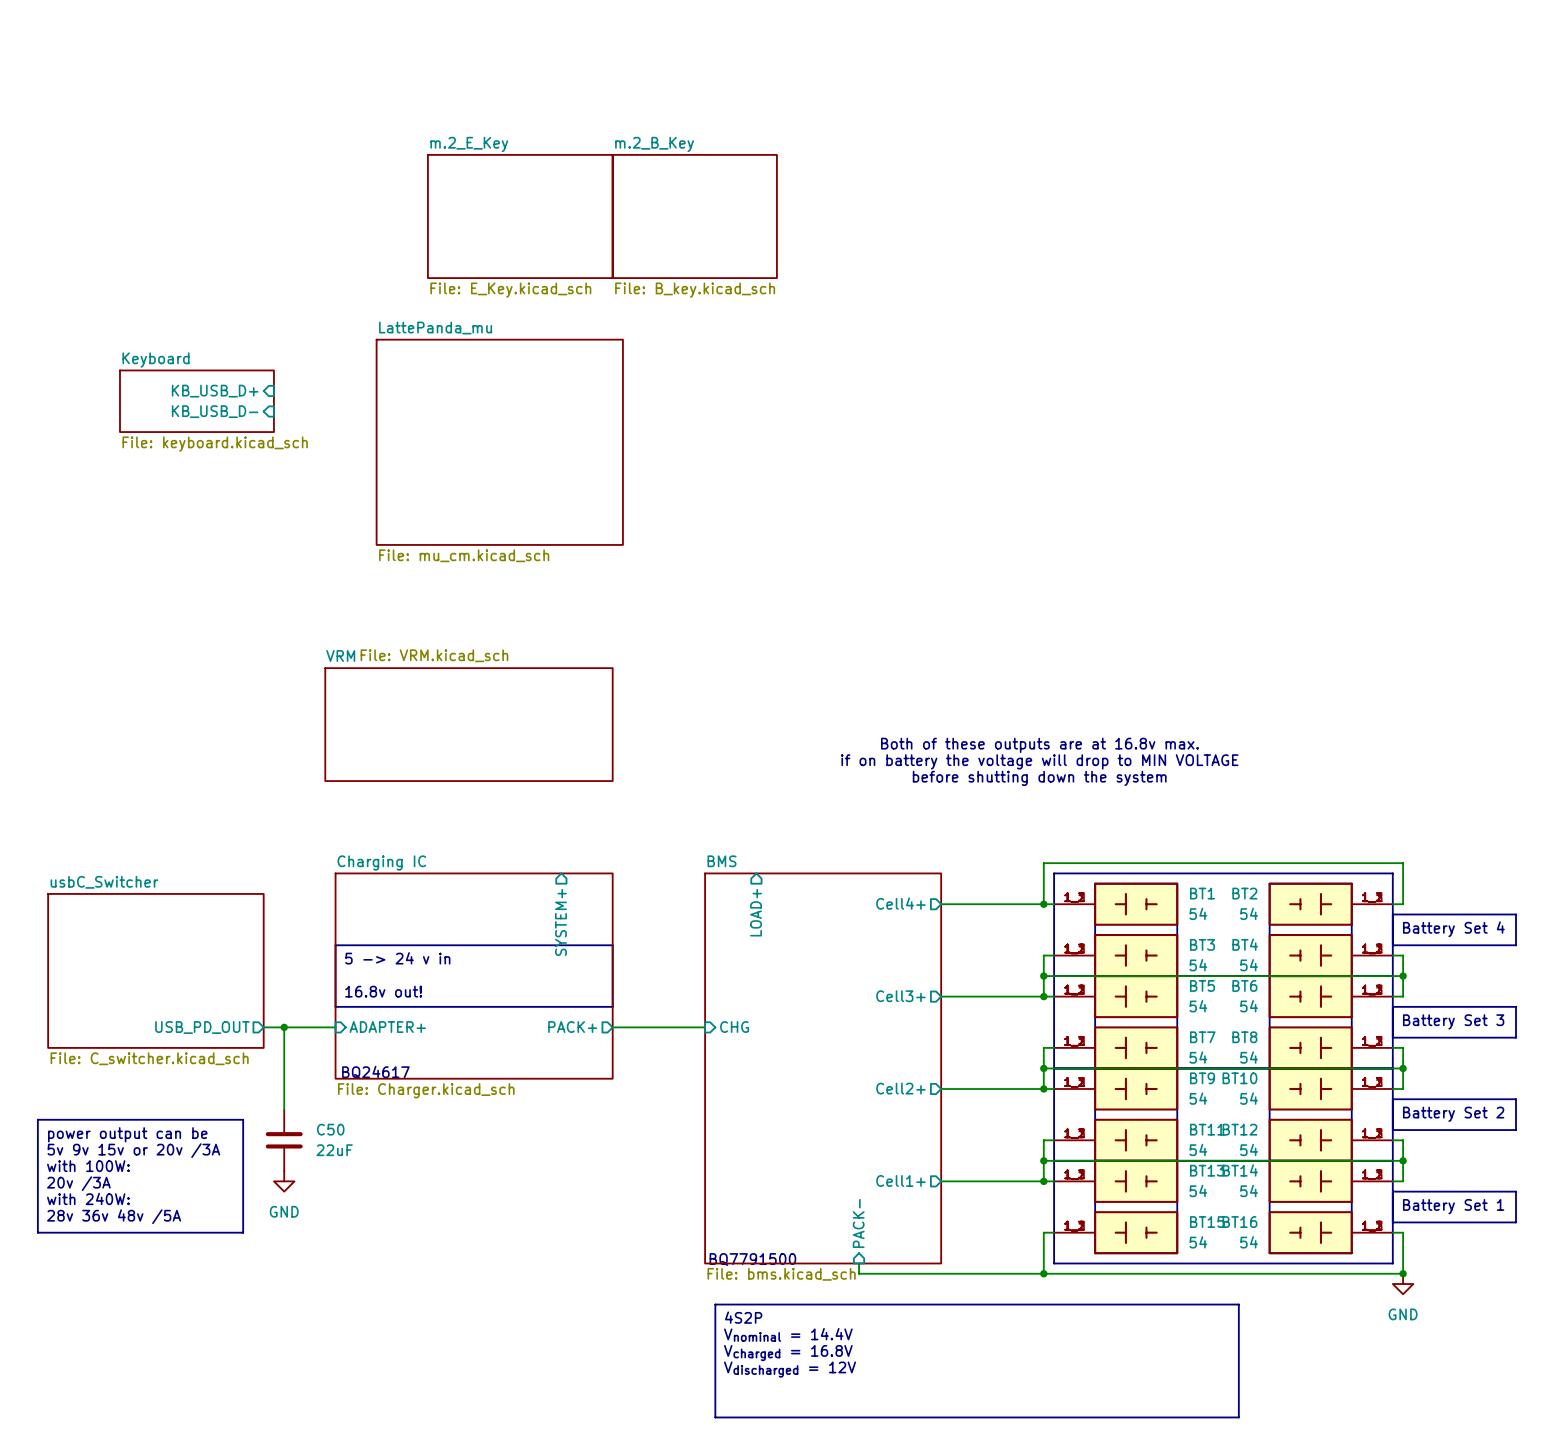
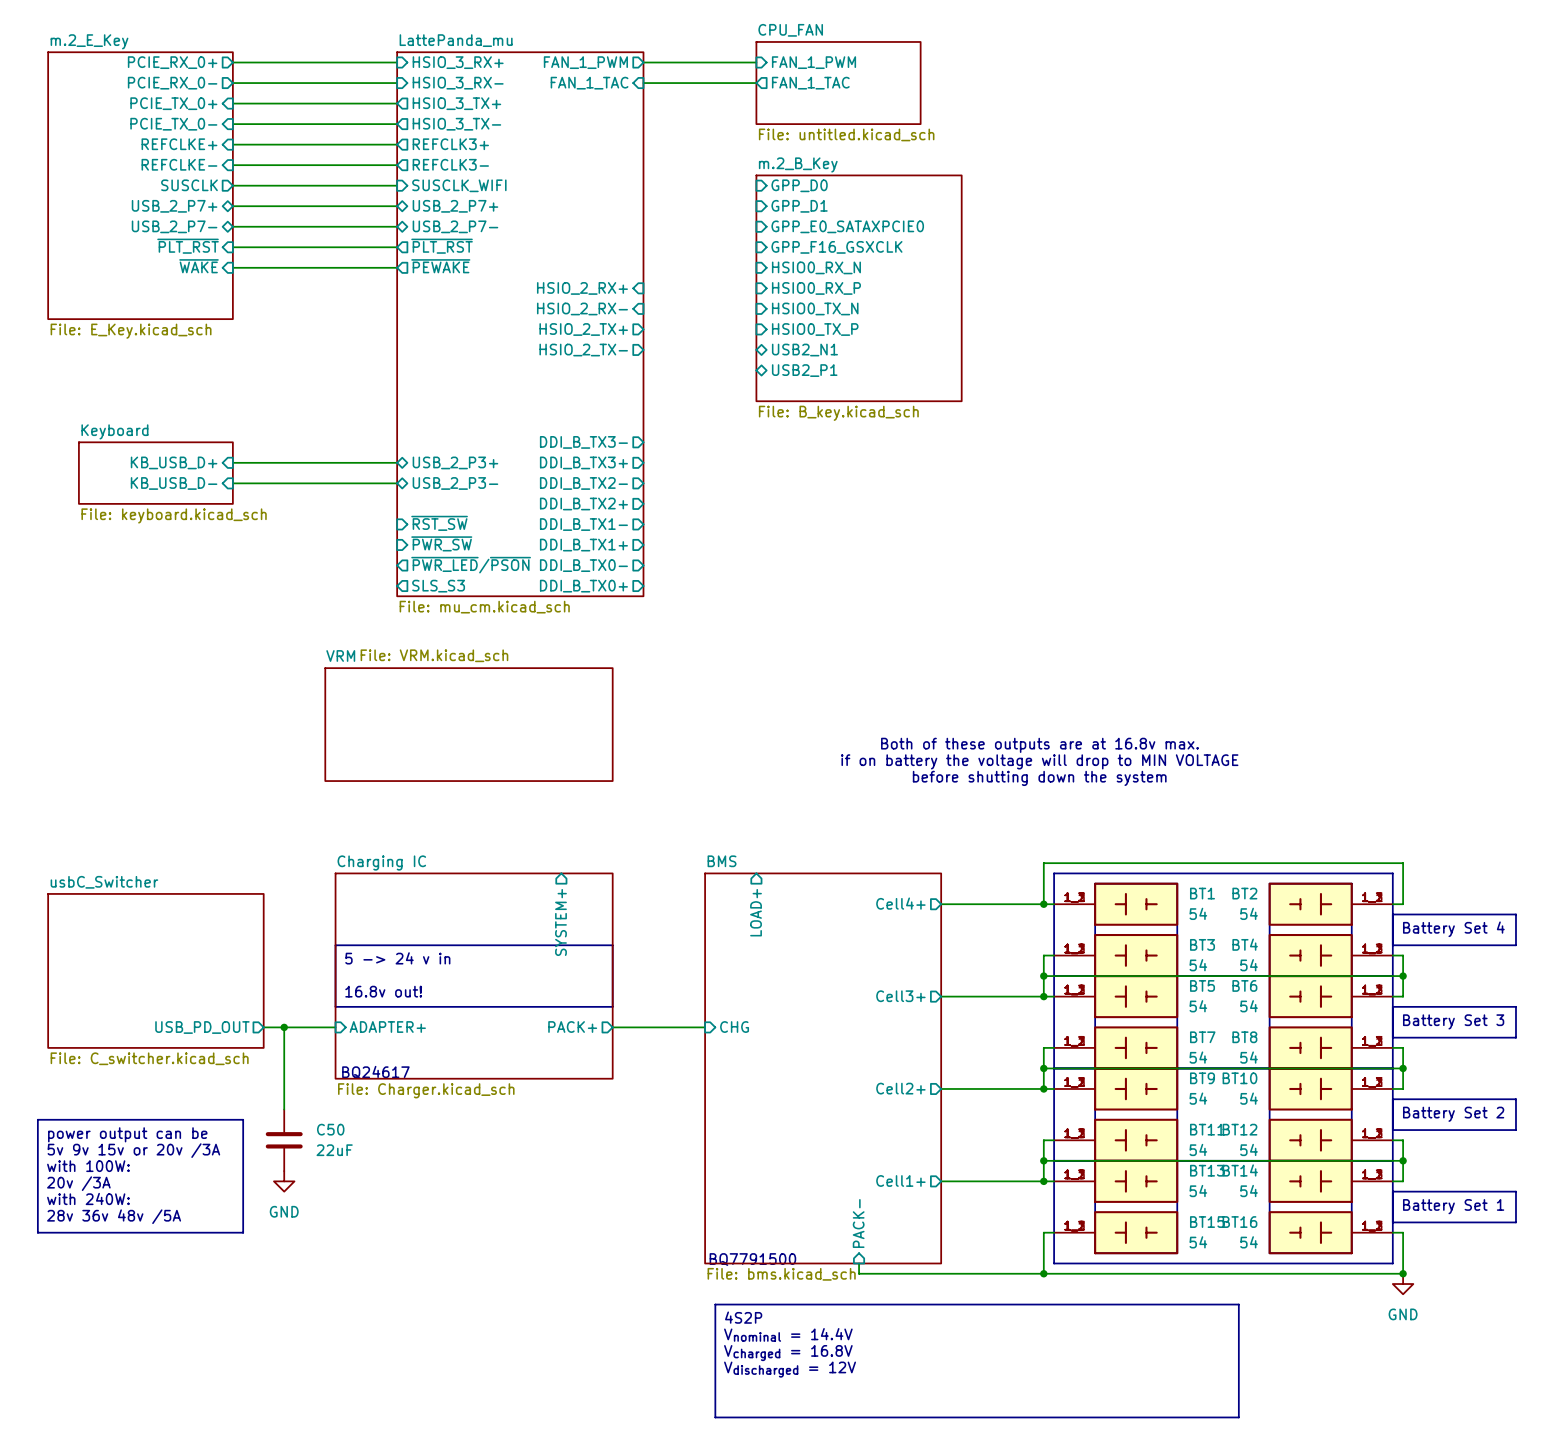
sheet pin: none -> PCIE_RX_0+ (172, 62)
wire: none -> (232, 62) (397, 62)
sheet pin: none -> HSIO_3_RX+ (458, 62)
sheet pin: none -> FAN_1_PWM (585, 62)
wire: none -> (643, 62) (756, 62)
sheet pin: none -> FAN_1_PWM (813, 62)
sheet pin: none -> PCIE_RX_0- (172, 83)
wire: none -> (232, 83) (397, 83)
sheet pin: none -> HSIO_3_RX- (458, 83)
sheet pin: none -> FAN_1_TAC (589, 83)
wire: none -> (643, 83) (756, 83)
sheet pin: none -> FAN_1_TAC (810, 83)
sheet CPU_FAN: none -> File: untitled.kicad_sch (838, 83)
sheet pin: none -> PCIE_TX_0+ (173, 103)
wire: none -> (232, 103) (397, 103)
sheet pin: none -> HSIO_3_TX+ (456, 103)
sheet pin: none -> PCIE_TX_0- (173, 124)
wire: none -> (232, 124) (397, 124)
sheet pin: none -> HSIO_3_TX- (456, 124)
sheet pin: none -> REFCLKE+ (179, 144)
wire: none -> (232, 144) (397, 144)
sheet pin: none -> REFCLK3+ (450, 144)
sheet m.2_E_Key name position: m.2_E_Key (469, 144) -> m.2_E_Key (89, 41)
sheet m.2_B_Key name position: m.2_B_Key (654, 144) -> m.2_B_Key (798, 164)
sheet m.2_E_Key shape: [427, 154, 614, 279] -> [47, 51, 234, 320]
sheet m.2_B_Key shape: [612, 154, 778, 279] -> [755, 174, 963, 402]
sheet pin: none -> REFCLKE- (179, 164)
sheet pin: none -> REFCLK3- (450, 164)
wire: none -> (232, 165) (397, 165)
sheet pin: none -> SUSCLK (189, 185)
wire: none -> (232, 185) (397, 185)
sheet pin: none -> SUSCLK_WIFI (459, 185)
sheet pin: none -> GPP_D0 (799, 185)
sheet pin: none -> USB_2_P7+ (174, 206)
wire: none -> (232, 206) (397, 206)
sheet pin: none -> USB_2_P7+ (455, 206)
sheet pin: none -> GPP_D1 (799, 206)
sheet pin: none -> USB_2_P7- (174, 226)
wire: none -> (232, 226) (397, 226)
sheet pin: none -> USB_2_P7- (455, 226)
sheet pin: none -> GPP_E0_SATAXPCIE0 (847, 226)
sheet pin: none -> ~{PLT_RST} (188, 246)
sheet pin: none -> ~{PLT_RST} (442, 246)
wire: none -> (232, 247) (397, 247)
sheet pin: none -> GPP_F16_GSXCLK (836, 247)
sheet pin: none -> ~{WAKE} (199, 266)
sheet pin: none -> ~{PEWAKE} (440, 266)
wire: none -> (232, 267) (397, 267)
sheet pin: none -> HSIO0_RX_N (816, 267)
sheet pin: none -> HSIO_2_RX+ (582, 288)
sheet pin: none -> HSIO0_RX_P (816, 288)
sheet m.2_E_Key value position: File: E_Key.kicad_sch (510, 290) -> File: E_Key.kicad_sch (131, 331)
sheet m.2_B_Key value position: File: B_key.kicad_sch (695, 290) -> File: B_key.kicad_sch (838, 413)
sheet pin: none -> HSIO_2_RX- (582, 308)
sheet pin: none -> HSIO0_TX_N (815, 308)
sheet LattePanda_mu: none -> File: mu_cm.kicad_sch (520, 324)
sheet pin: none -> HSIO_2_TX+ (583, 329)
sheet pin: none -> HSIO0_TX_P (815, 329)
sheet pin: none -> HSIO_2_TX- (583, 350)
sheet pin: none -> USB2_N1 (804, 350)
sheet pin: none -> USB2_P1 (804, 370)
sheet pin position: KB_USB_D+ (215, 391) -> KB_USB_D+ (174, 462)
sheet Keyboard position: (196, 401) -> (155, 473)
sheet pin position: KB_USB_D- (215, 411) -> KB_USB_D- (174, 483)
sheet LattePanda_mu: File: mu_cm.kicad_sch (499, 442) -> none
sheet pin: none -> DDI_B_TX3- (583, 442)
wire: none -> (232, 462) (397, 462)
sheet pin: none -> USB_2_P3+ (455, 462)
sheet pin: none -> DDI_B_TX3+ (583, 462)
wire: none -> (232, 483) (397, 483)
sheet pin: none -> USB_2_P3- (455, 483)
sheet pin: none -> DDI_B_TX2- (583, 483)
sheet pin: none -> DDI_B_TX2+ (583, 504)
sheet pin: none -> ~{RST_SW} (439, 523)
sheet pin: none -> DDI_B_TX1- (583, 524)
sheet pin: none -> ~{PWR_SW} (441, 543)
sheet pin: none -> DDI_B_TX1+ (583, 545)
sheet pin: none -> ~{PWR_LED}/~{PSON} (471, 565)
sheet pin: none -> DDI_B_TX0- (583, 565)
sheet pin: none -> SLS_S3 (438, 586)
sheet pin: none -> DDI_B_TX0+ (583, 586)

